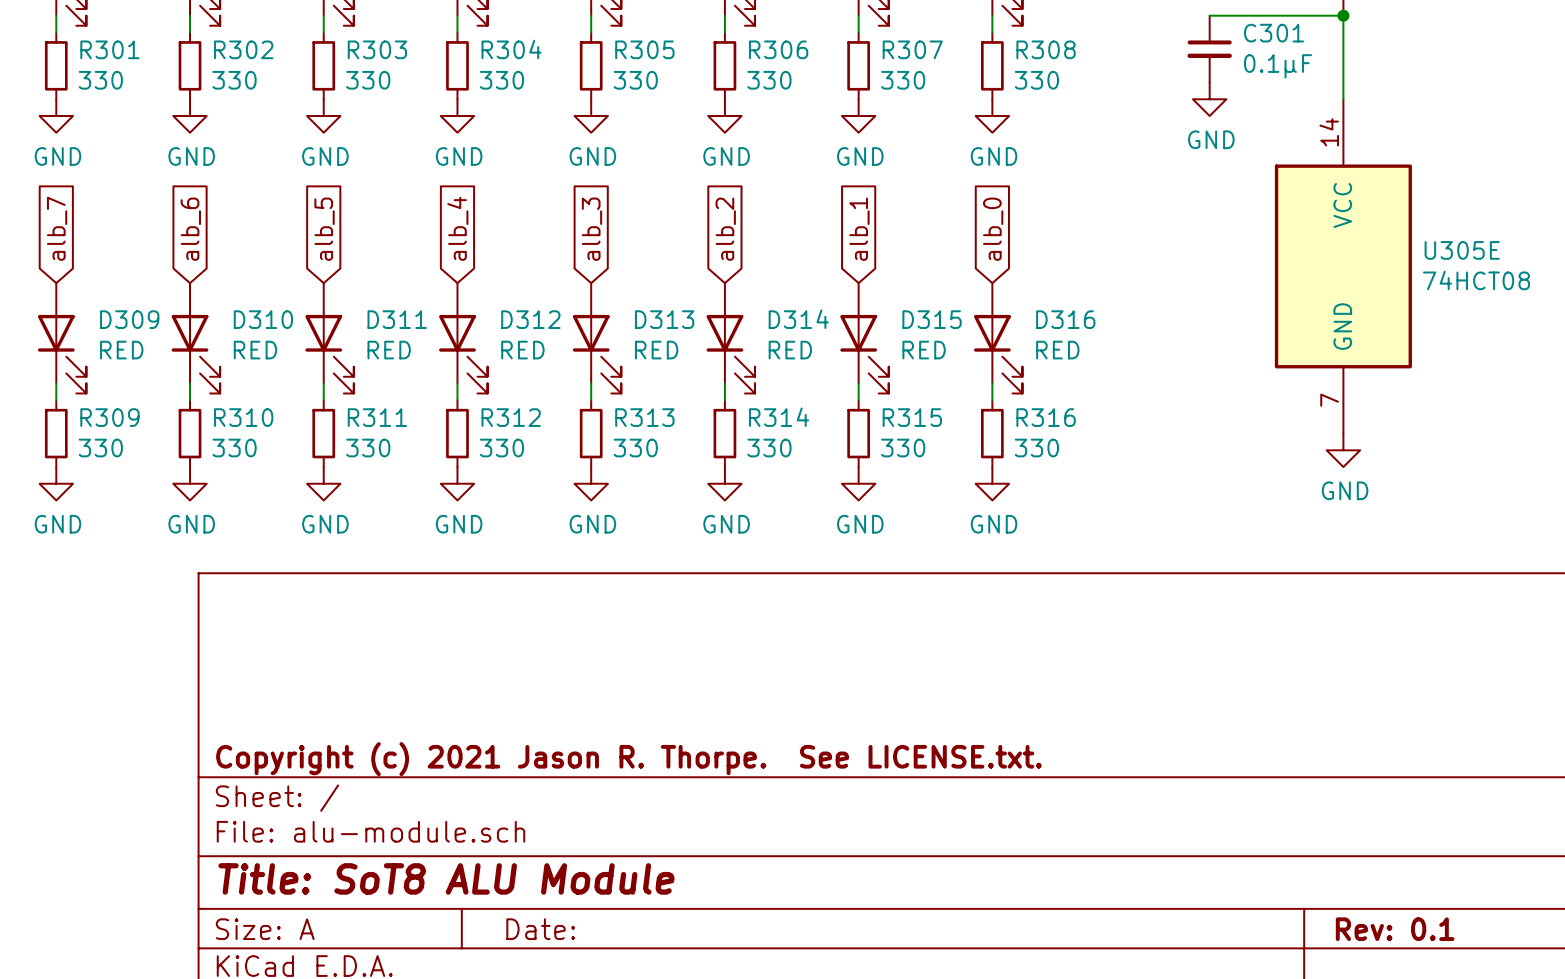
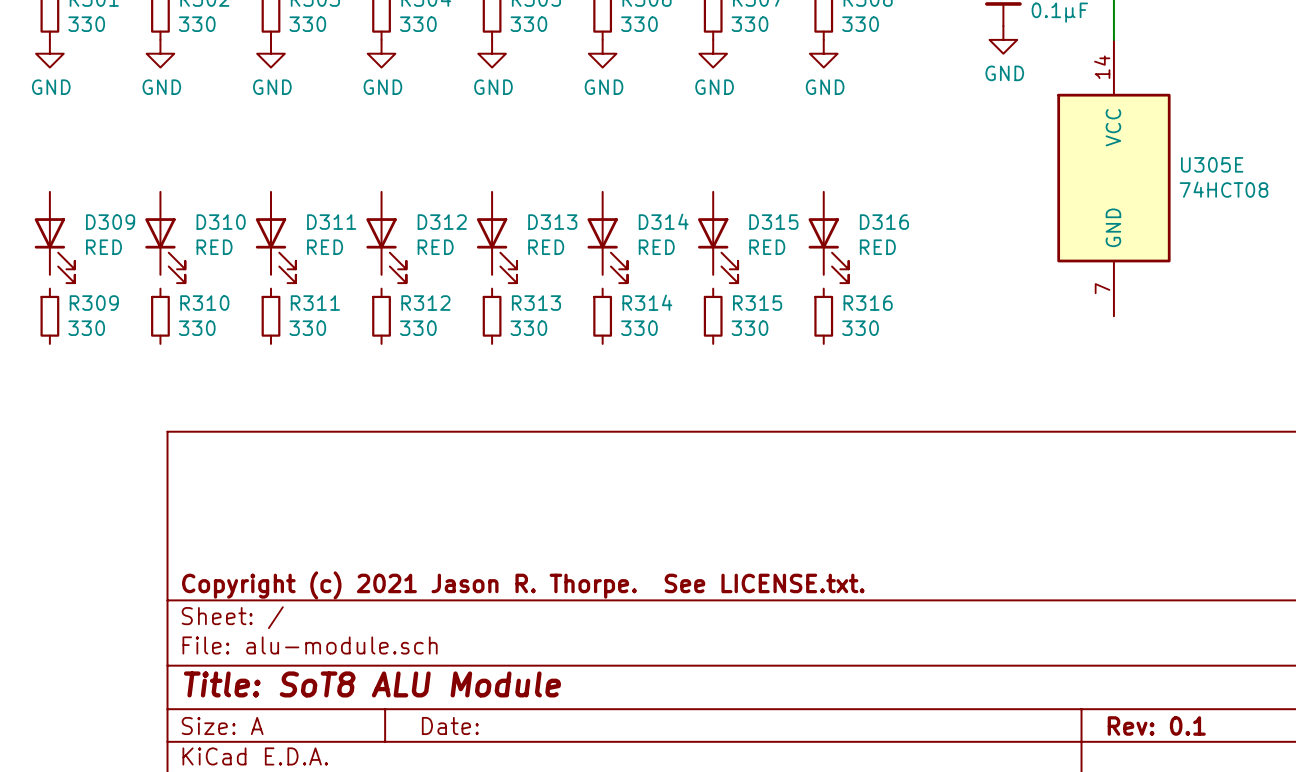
global label: alb_7 (57, 228) -> none
global label: alb_4 (457, 228) -> none
global label: alb_6 (190, 229) -> none
global label: alb_5 (324, 229) -> none
global label: alb_3 (591, 229) -> none
global label: alb_2 (725, 229) -> none
global label: alb_1 (859, 229) -> none
global label: alb_0 (993, 229) -> none
wire: (56, 383) (56, 400) -> none
wire: (190, 383) (190, 400) -> none
wire: (323, 383) (323, 400) -> none
wire: (457, 383) (457, 400) -> none
wire: (591, 383) (591, 400) -> none
wire: (724, 383) (724, 400) -> none
wire: (858, 383) (858, 400) -> none
wire: (992, 383) (992, 400) -> none
power symbol: GND (1343, 450) -> none
power symbol: GND (56, 483) -> none
power symbol: GND (190, 483) -> none
power symbol: GND (323, 483) -> none
power symbol: GND (457, 483) -> none
power symbol: GND (591, 483) -> none
power symbol: GND (724, 483) -> none
power symbol: GND (858, 483) -> none
power symbol: GND (992, 483) -> none

